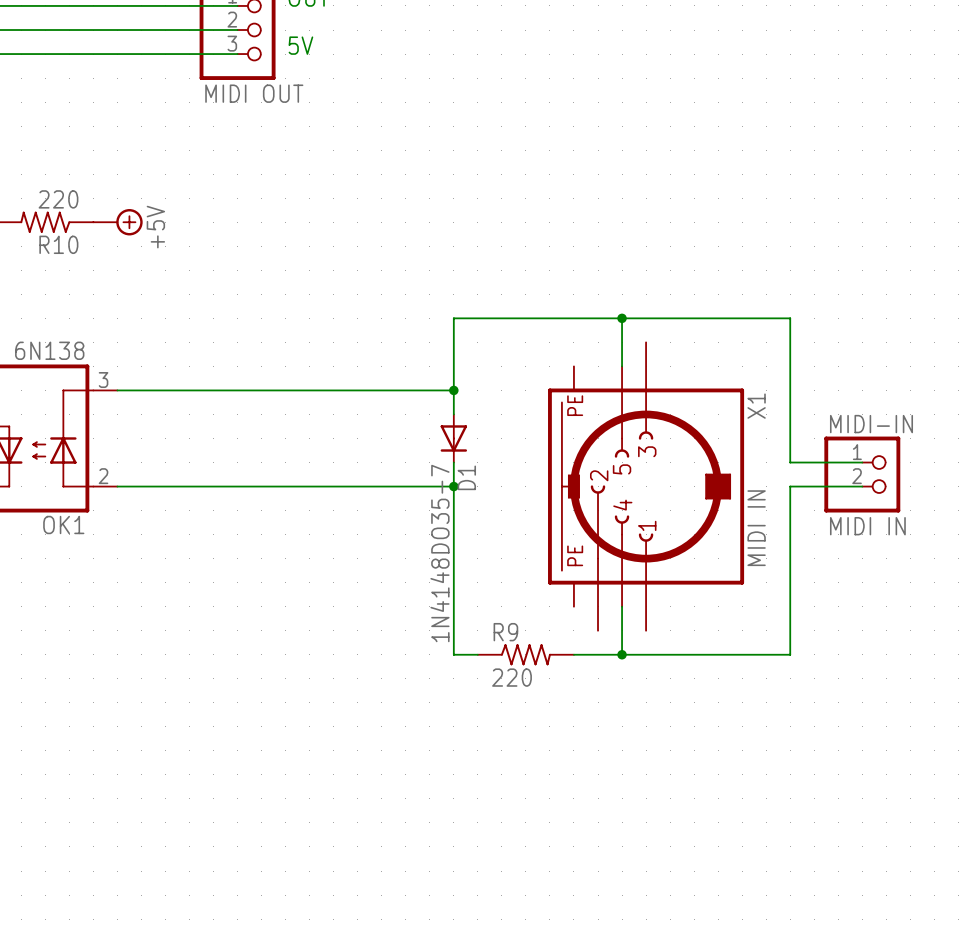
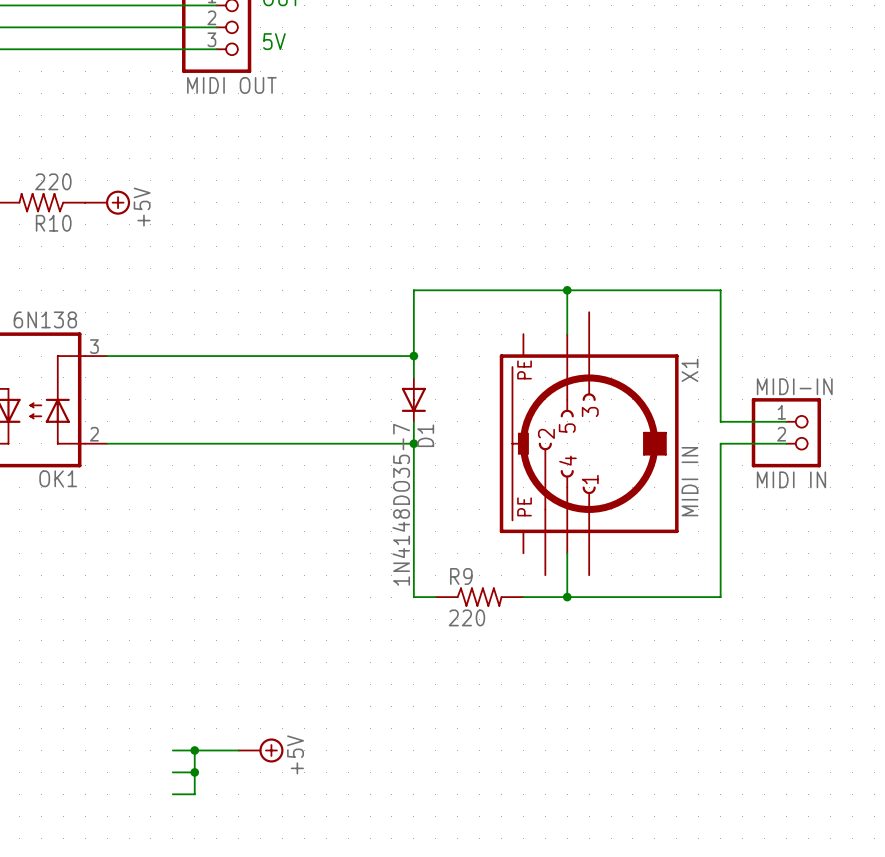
wire: none -> (172, 750) (238, 750)
wire: none -> (194, 750) (194, 794) (172, 794)
junction: none -> (194, 750)
power symbol: none -> +5V (261, 750)
wire: none -> (172, 772) (194, 772)
junction: none -> (194, 772)

